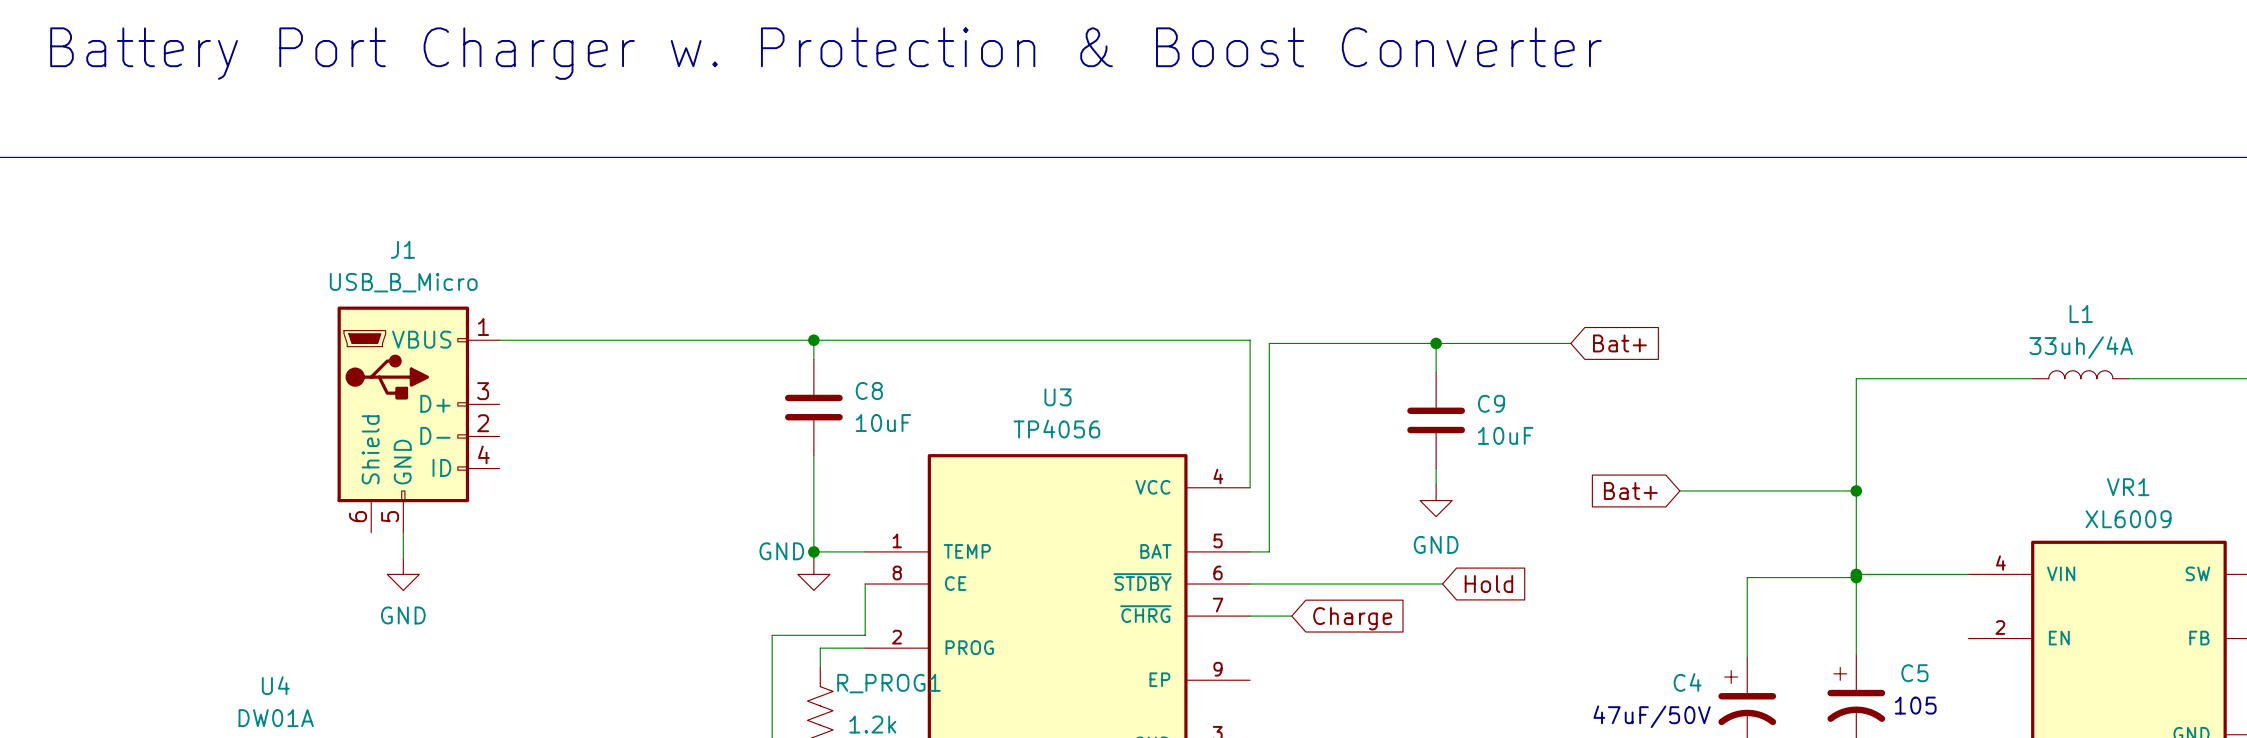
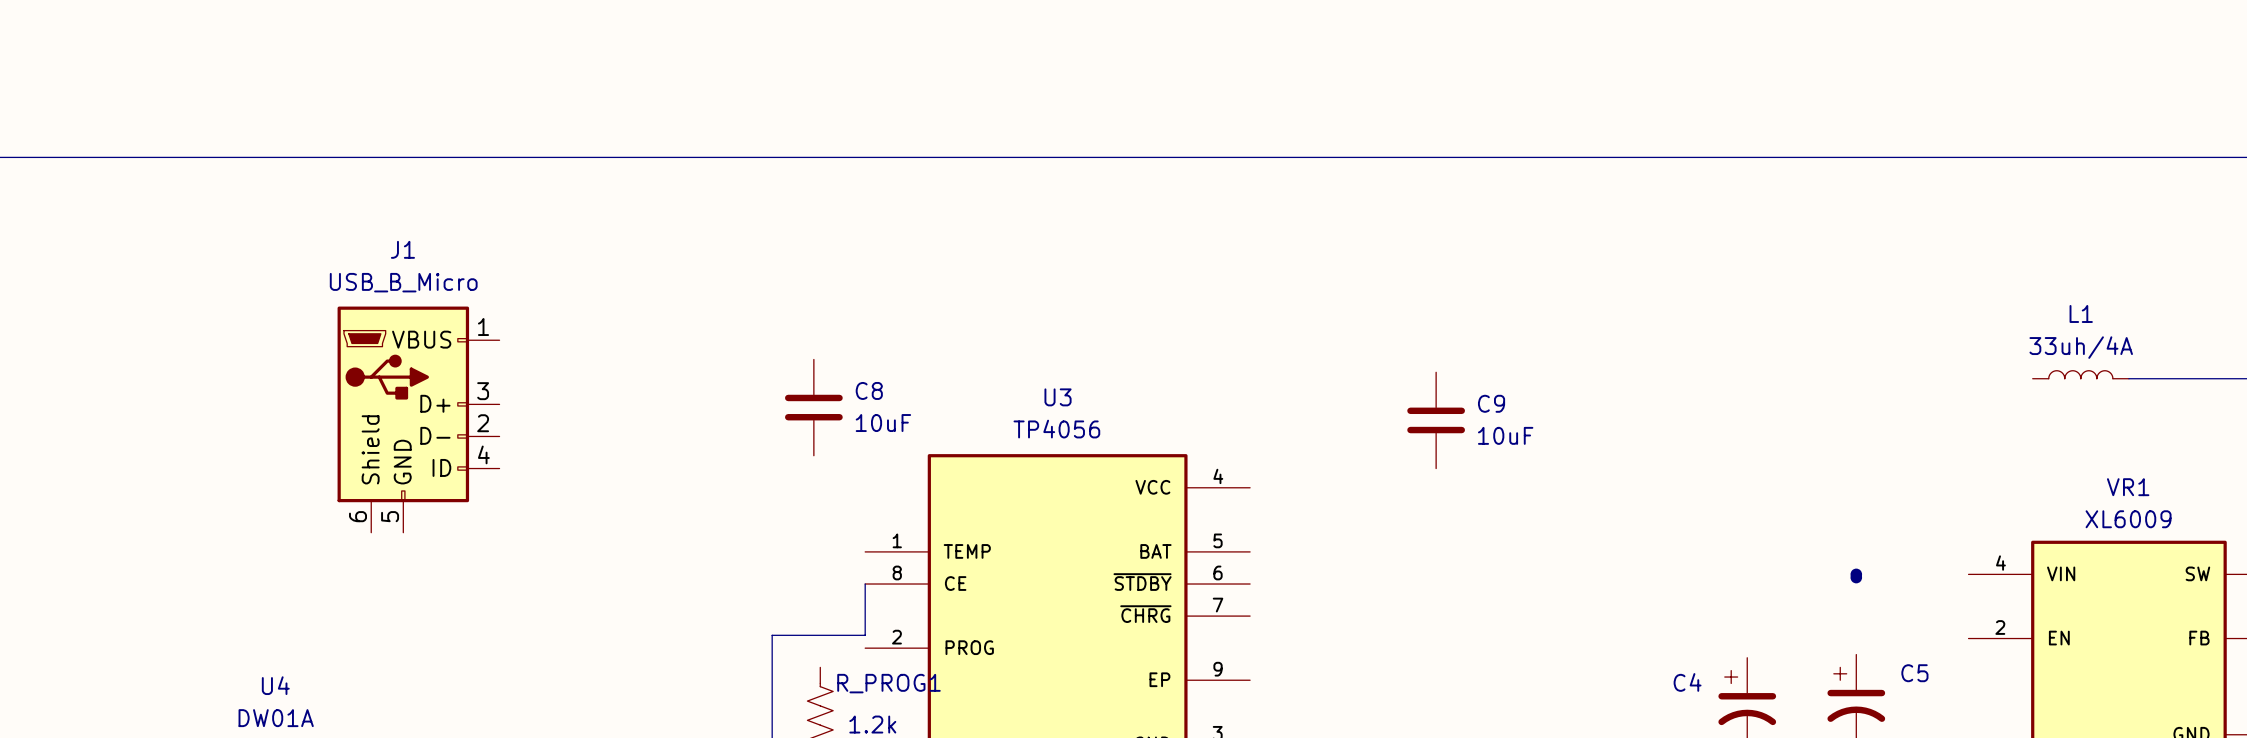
text: Battery Port Charger w. Protection & Boost Converter (825, 53) -> none
wire: (499, 340) (1250, 340) (1250, 487) -> none
wire: (813, 340) (813, 359) -> none
junction: (813, 340) -> none
wire: (1436, 343) (1436, 372) -> none
junction: (1436, 343) -> none
wire: (1570, 343) (1269, 343) (1269, 551) (1250, 551) -> none
global label: Bat+ (1619, 343) -> none
wire: (2032, 378) (1856, 378) (1856, 654) -> none
wire: (813, 455) (813, 558) -> none
wire: (1436, 468) (1436, 484) -> none
global label: Bat+ (1630, 490) -> none
wire: (1679, 490) (1856, 490) -> none
junction: (1856, 490) -> none
power symbol: GND (1436, 500) -> none
wire: (403, 532) (403, 558) -> none
wire: (813, 551) (865, 551) -> none
junction: (813, 551) -> none
power symbol: GND (403, 574) -> none
power symbol: GND (813, 574) -> none
wire: (1856, 574) (1968, 574) -> none
wire: (1856, 577) (1747, 577) (1747, 657) -> none
wire: (1250, 584) (1442, 584) -> none
global label: Hold (1488, 584) -> none
wire: (1250, 616) (1291, 616) -> none
global label: Charge (1352, 618) -> none
wire: (865, 648) (820, 648) (820, 667) -> none
text: 105 (1915, 705) -> none
text: 47uF/50V (1652, 716) -> none

